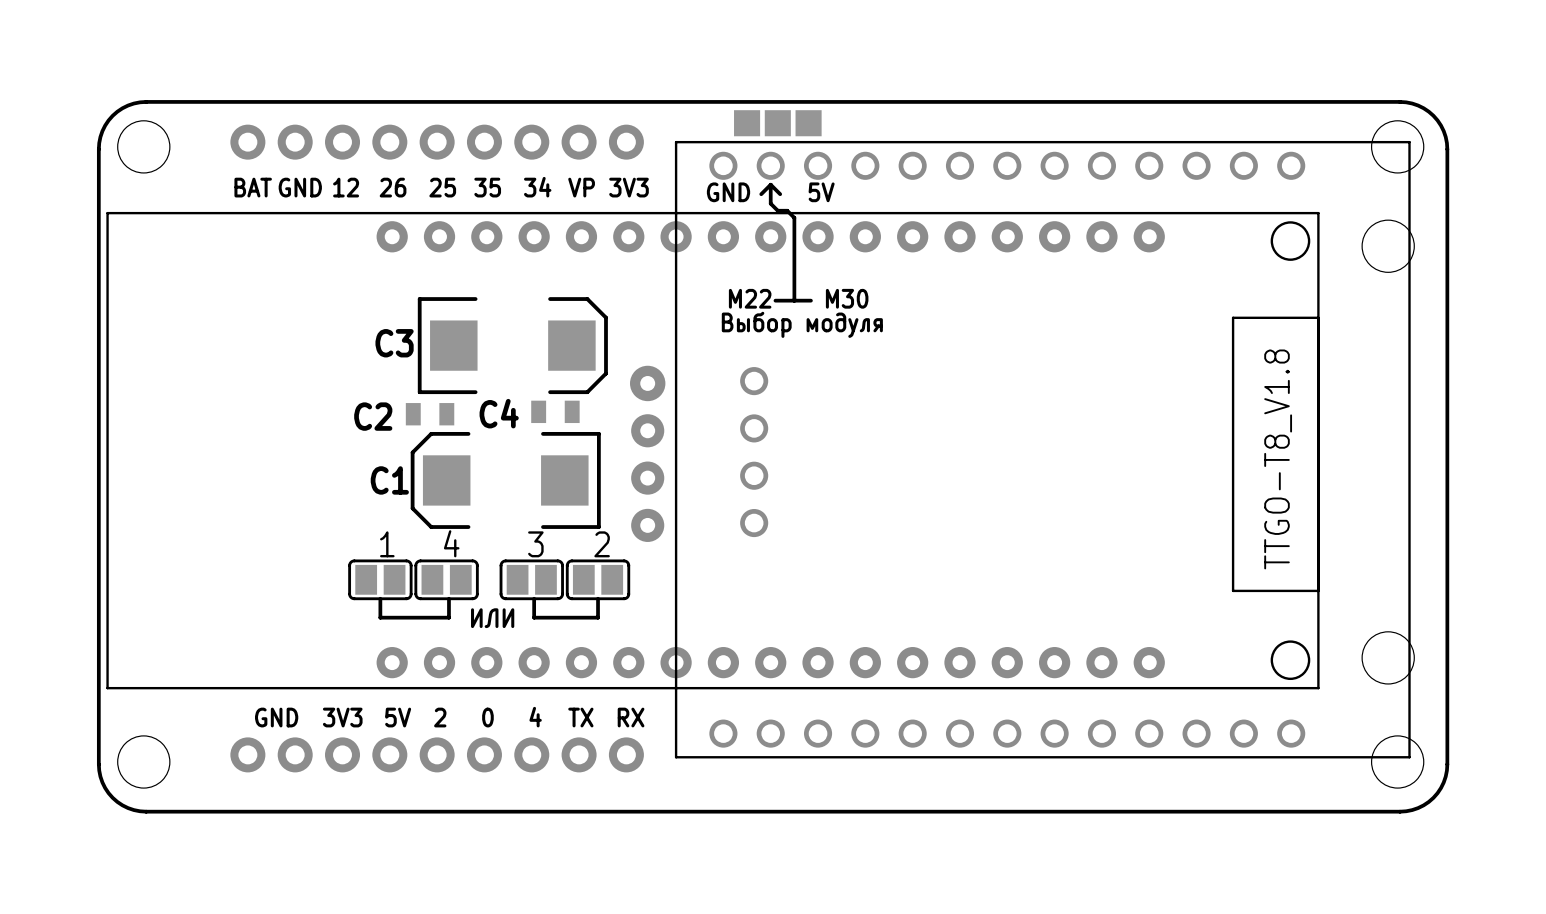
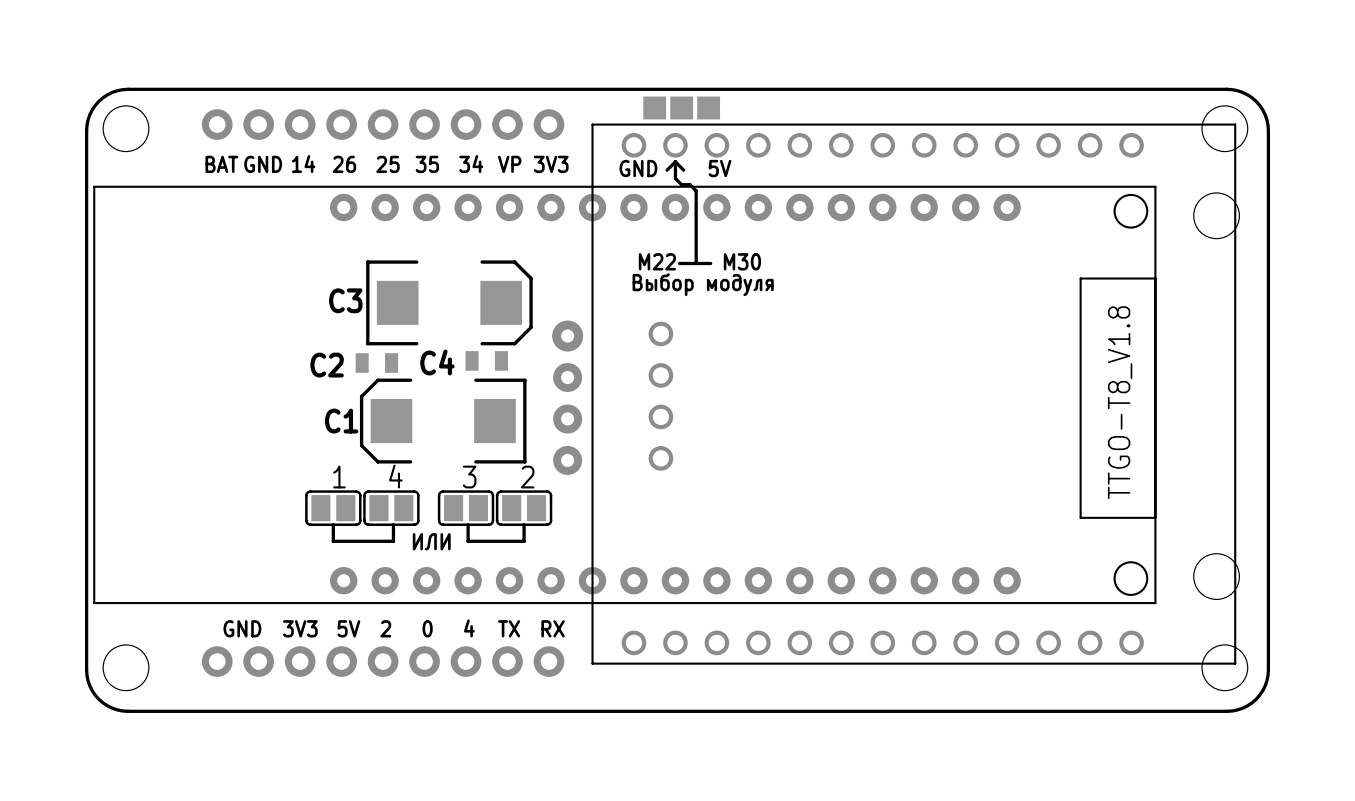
text: 12 (346, 187) -> 14 (303, 164)

